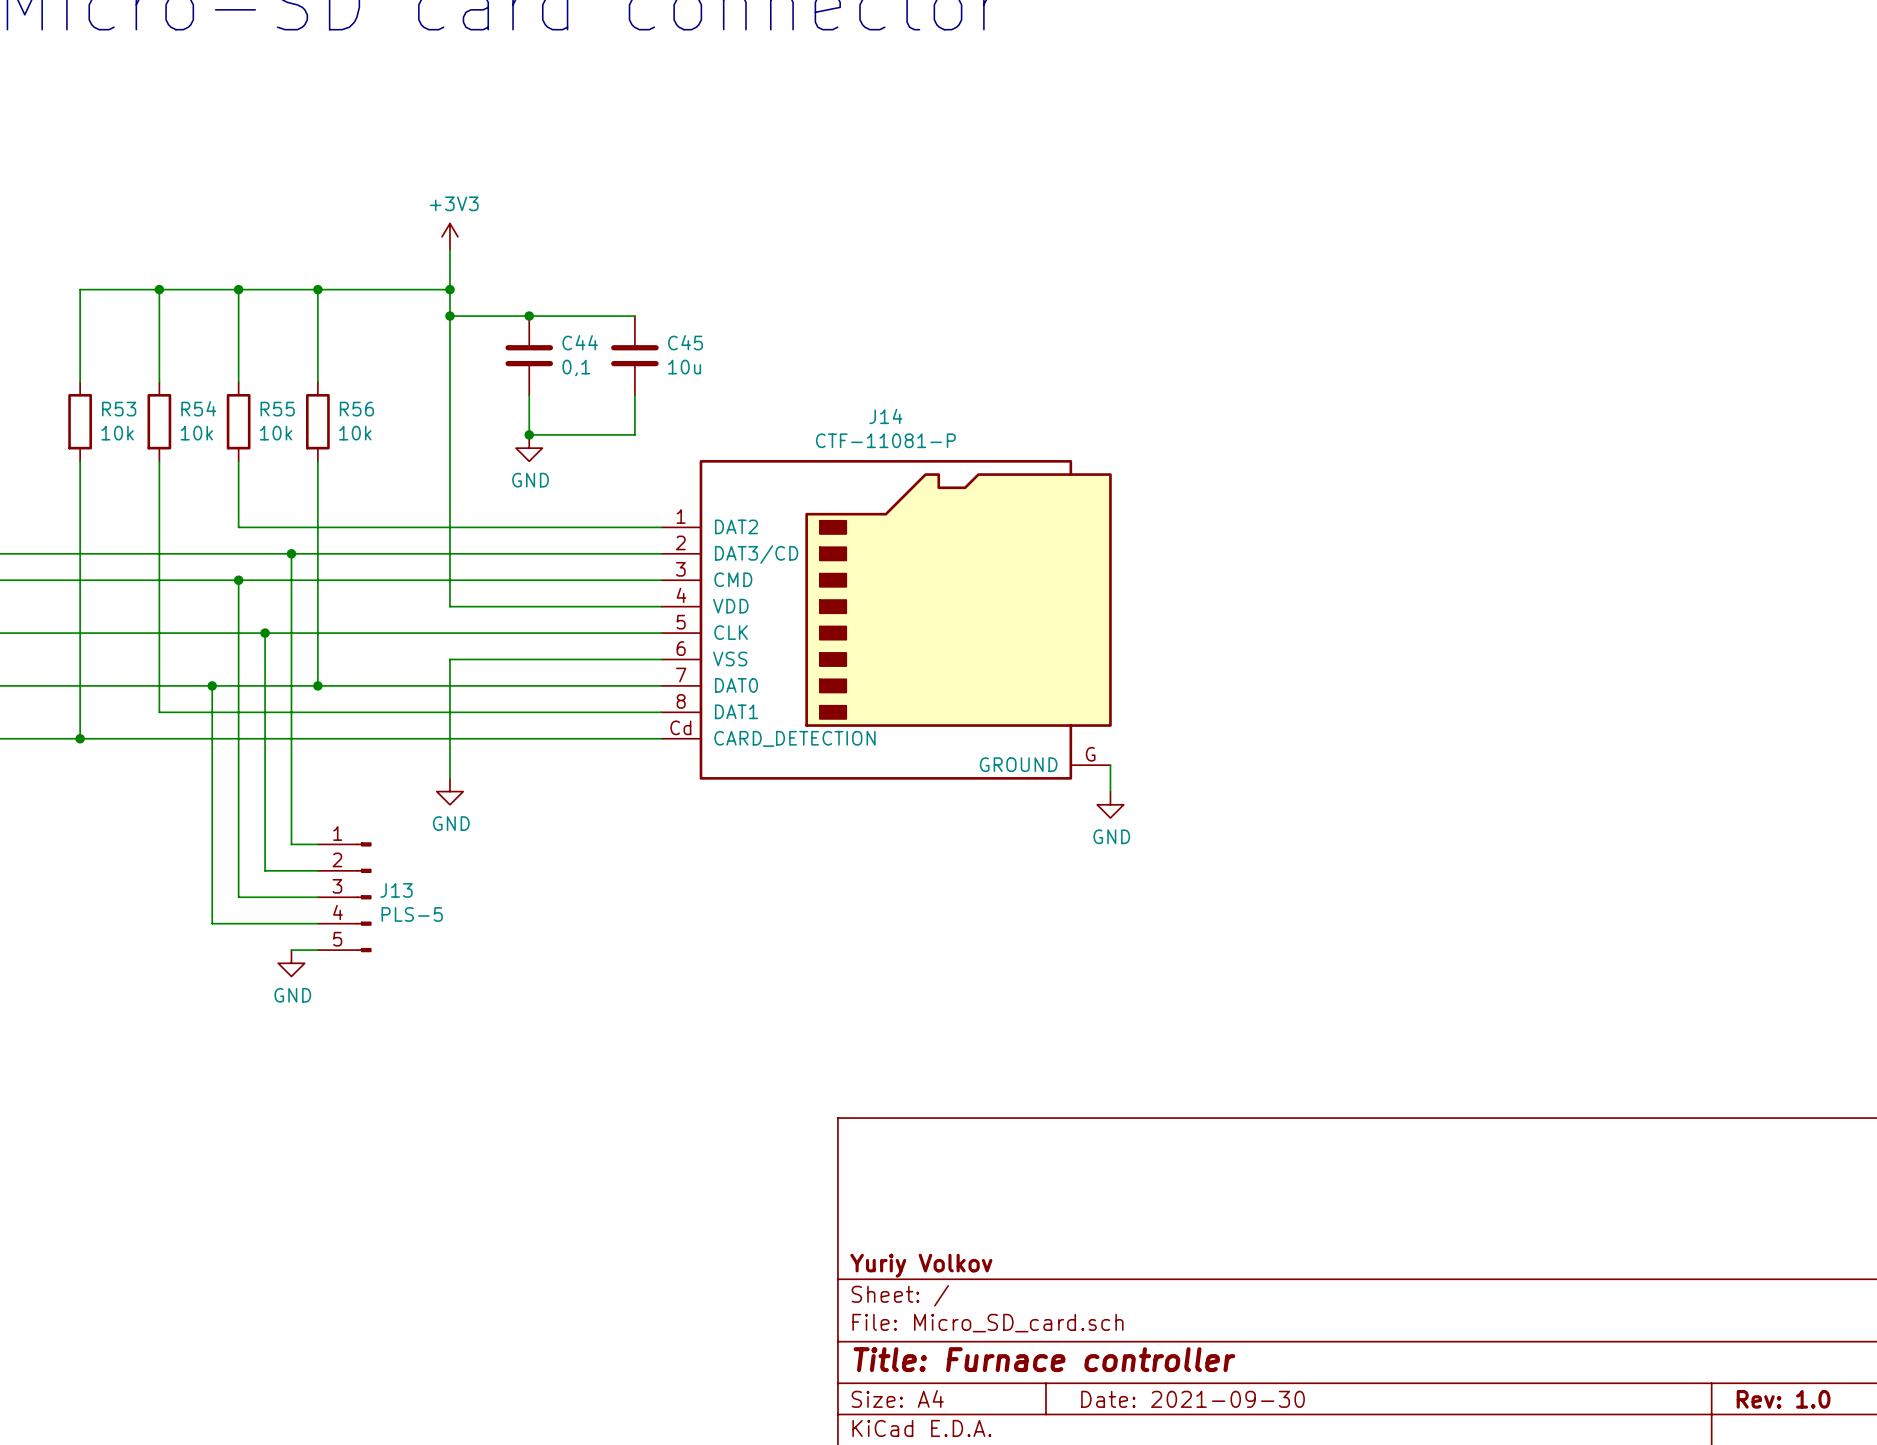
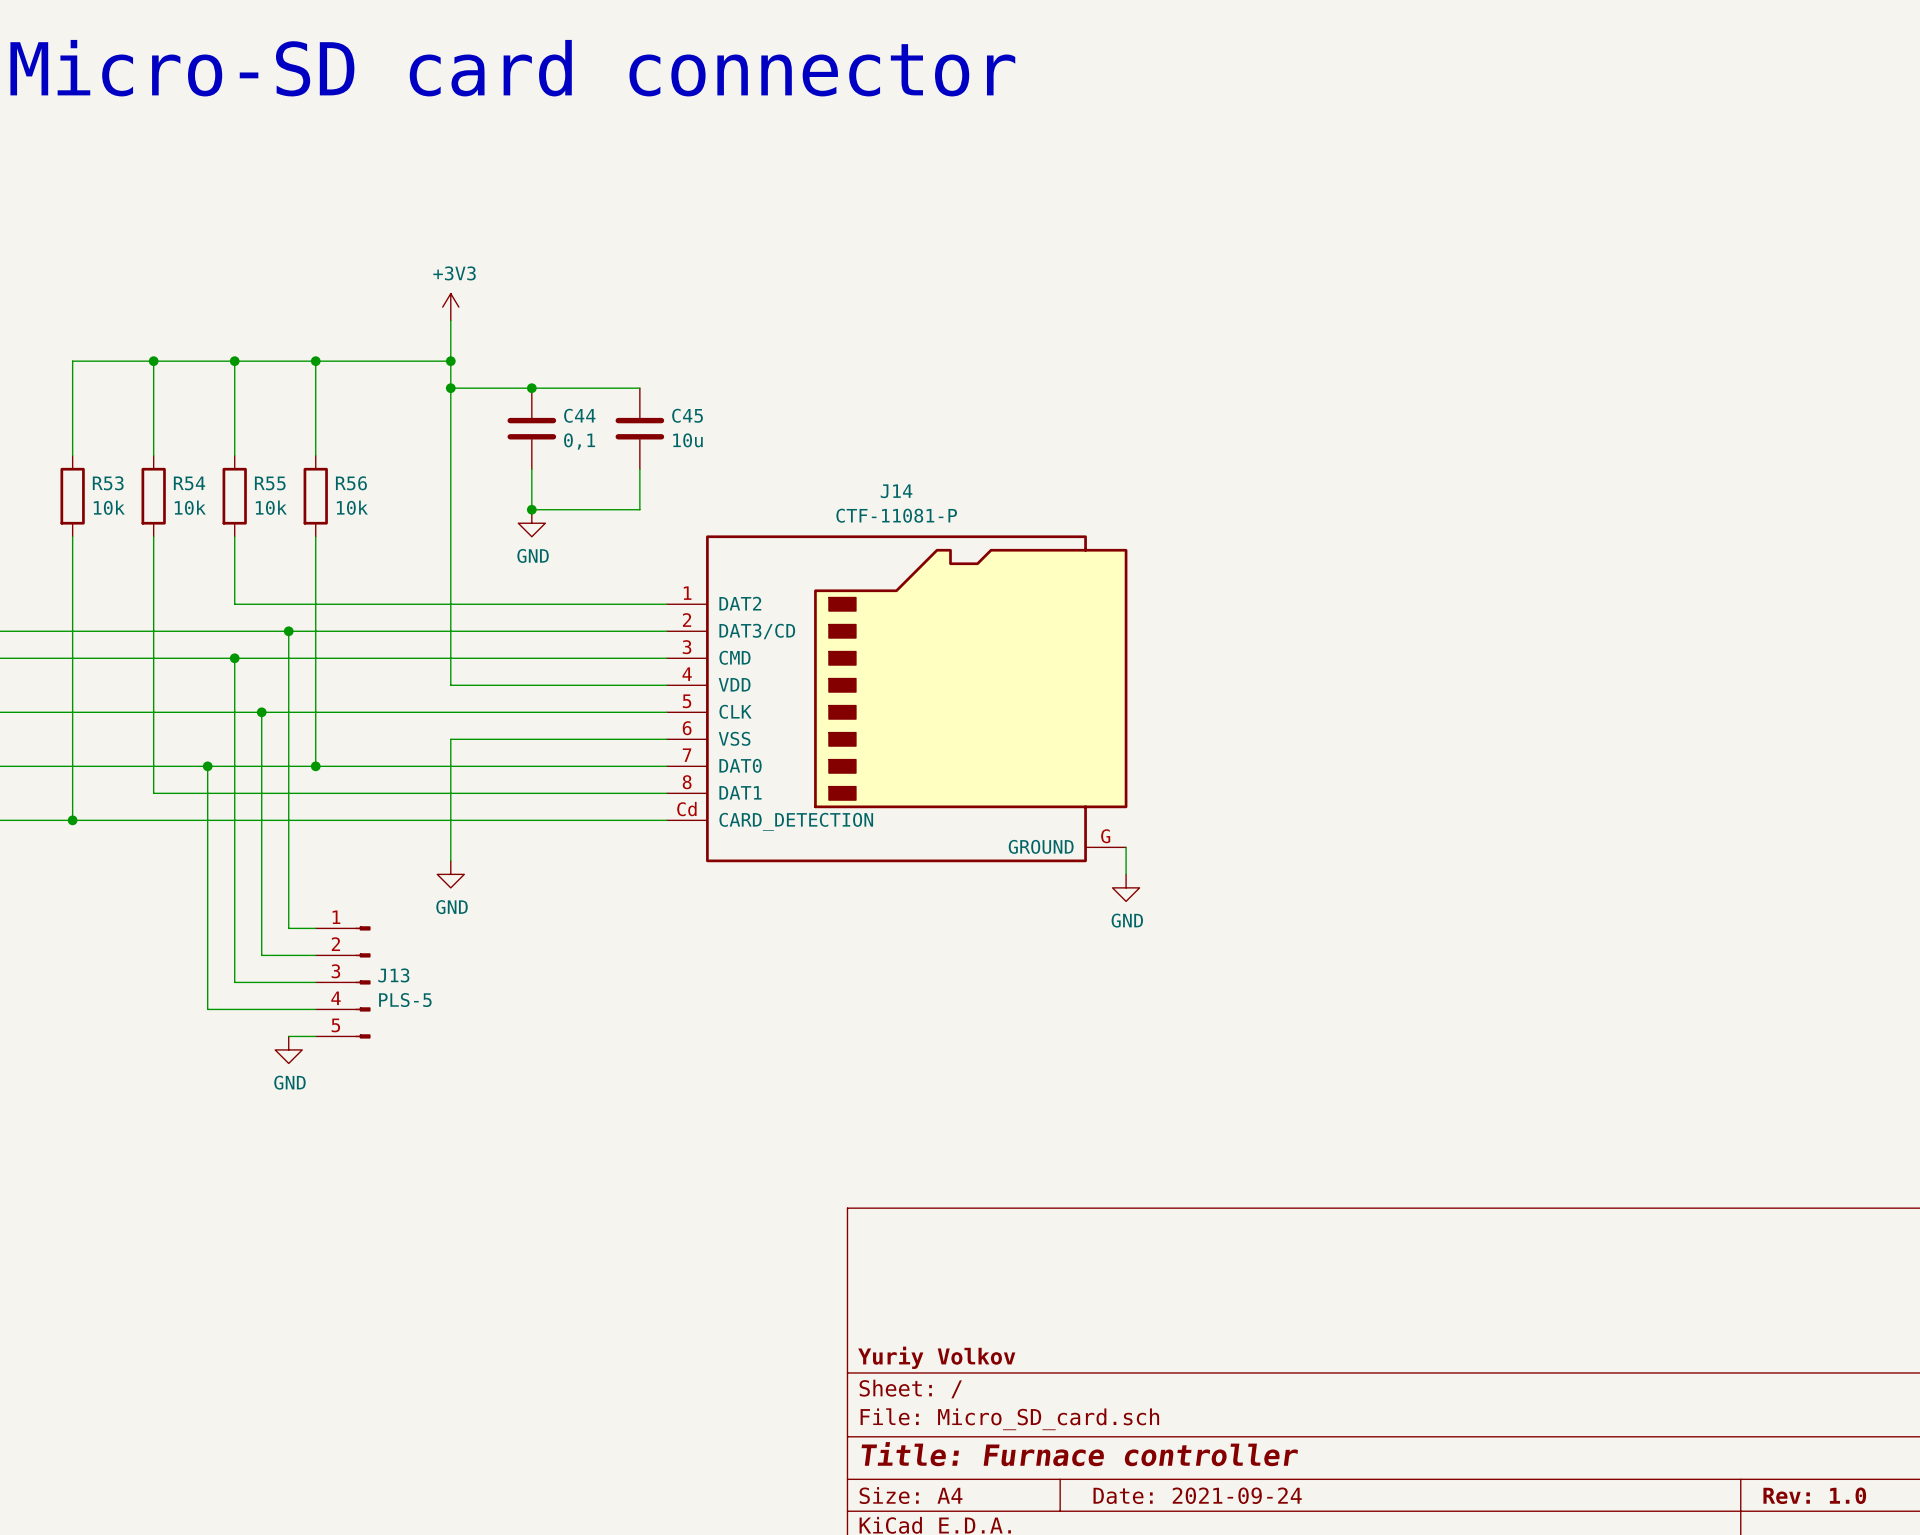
title block: Date: 2021-09-30 (1193, 1399) -> Date: 2021-09-24 (1197, 1495)

